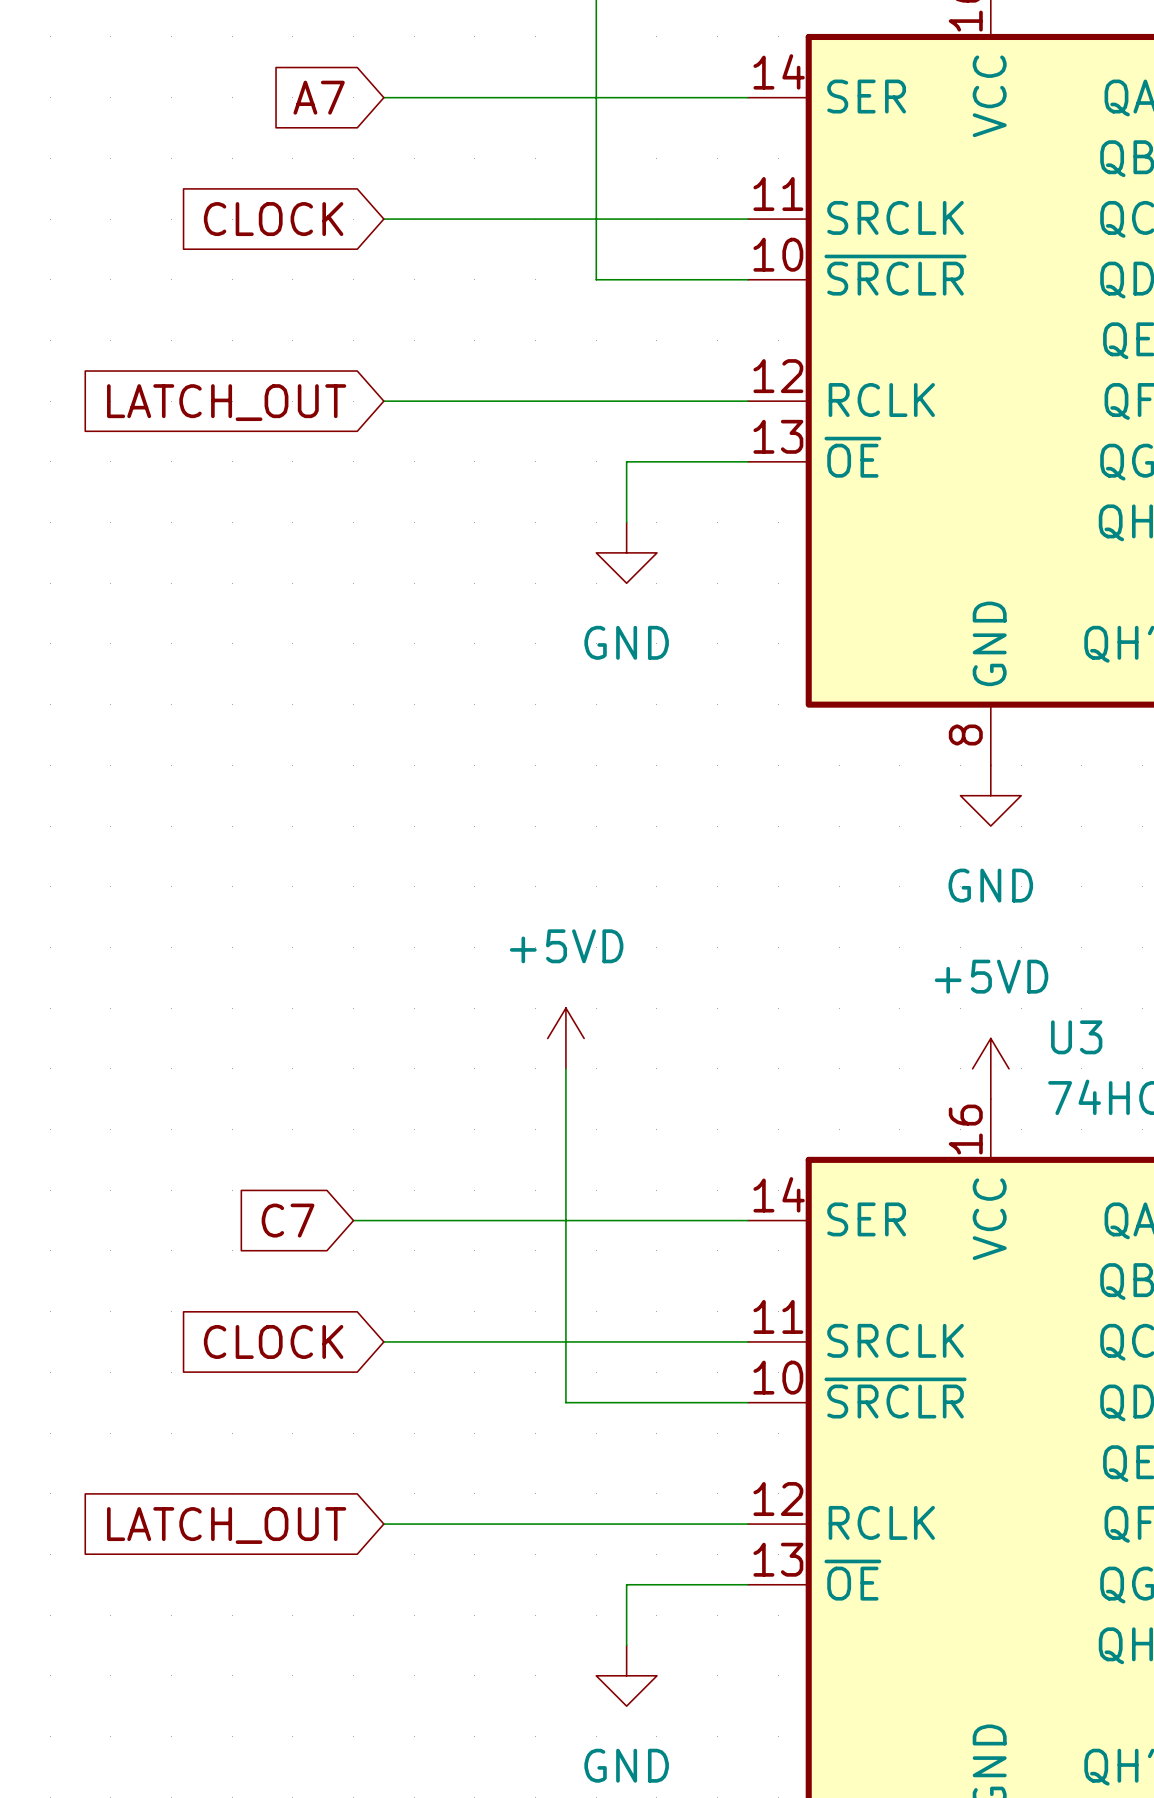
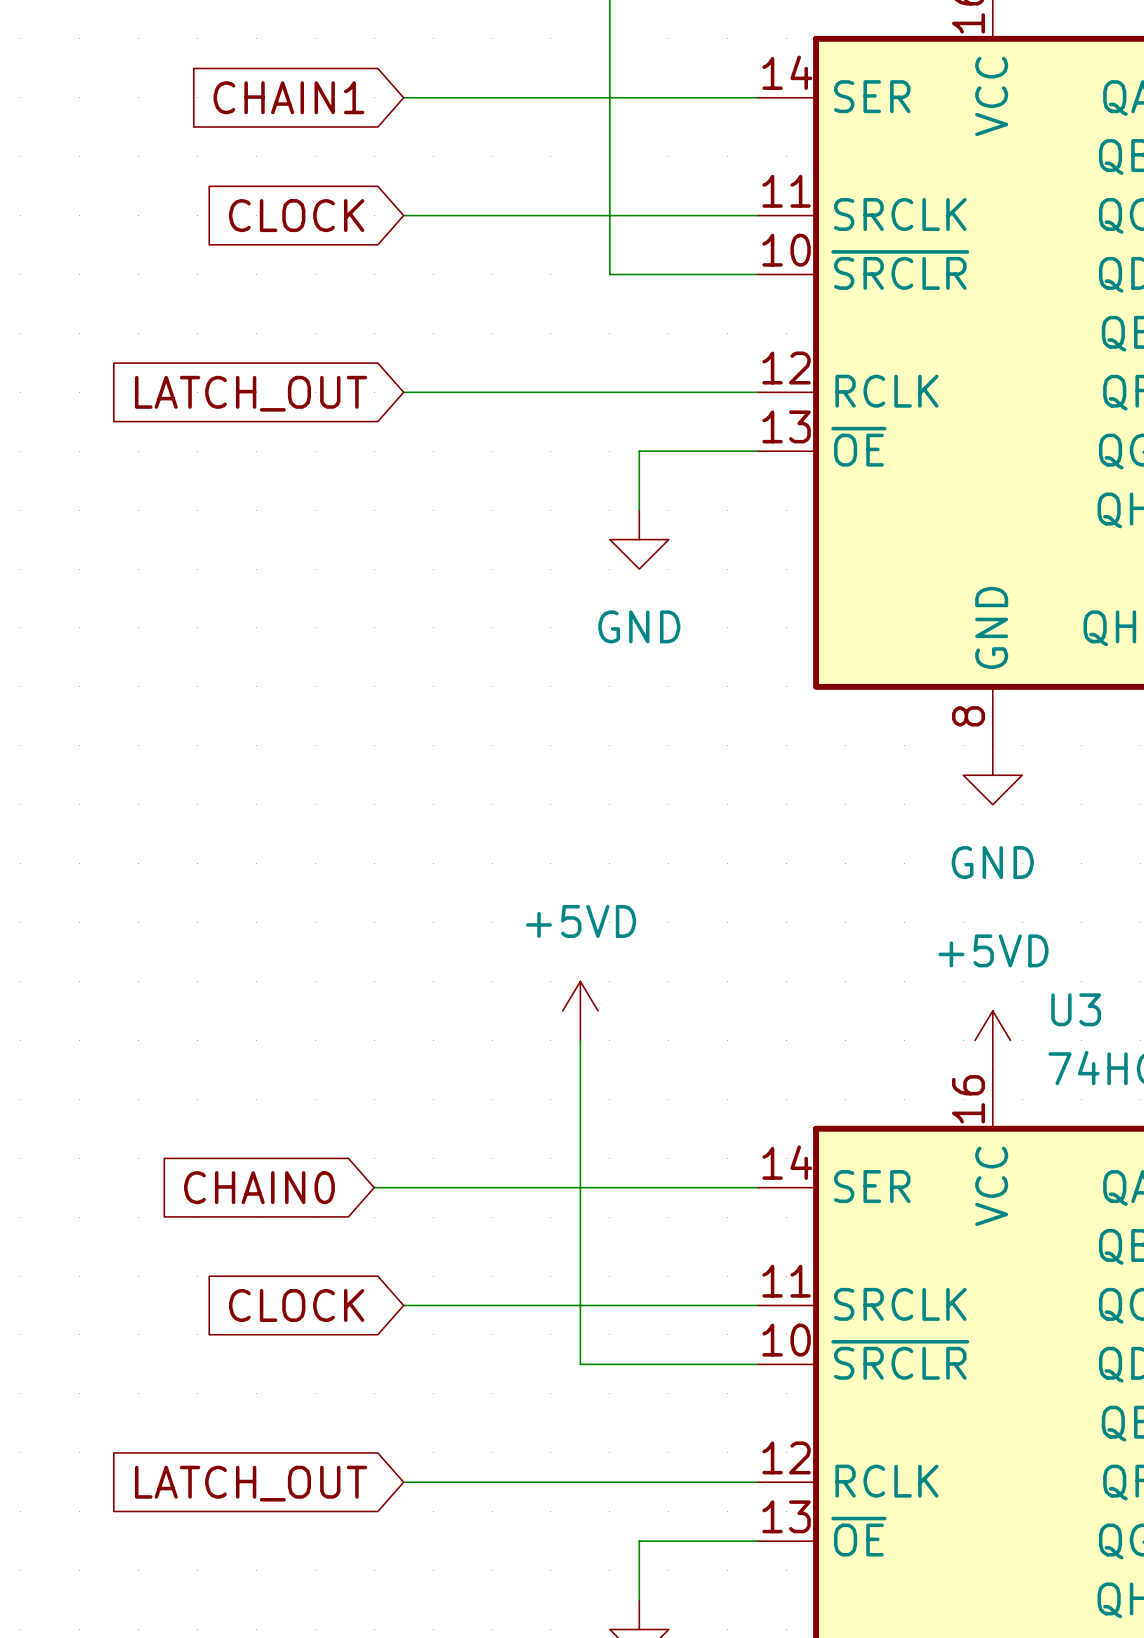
global label: A7 (319, 97) -> CHAIN1 (288, 97)
global label: C7 (288, 1220) -> CHAIN0 (259, 1187)

